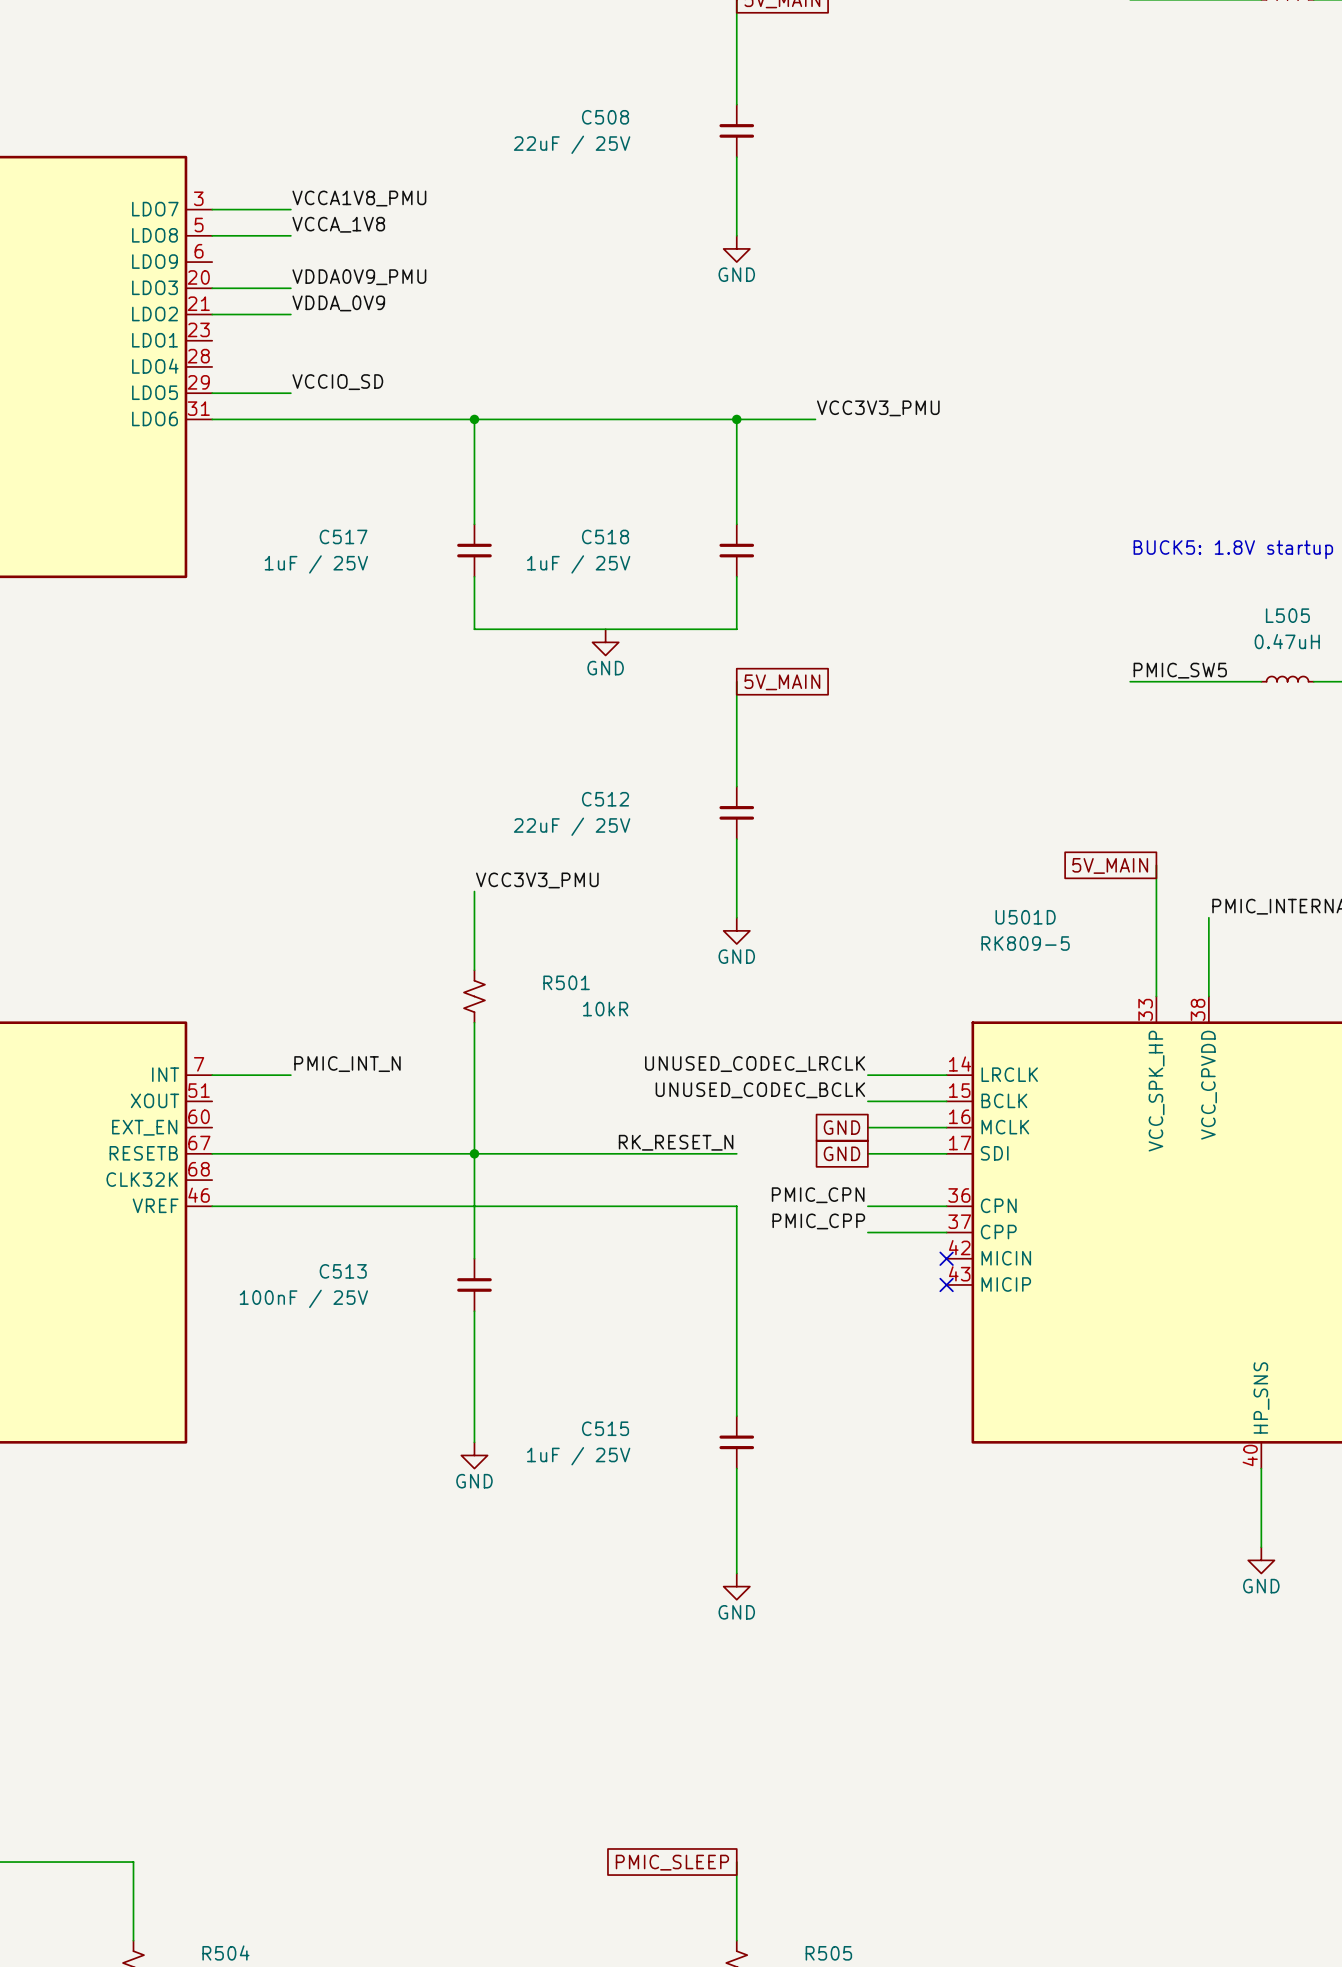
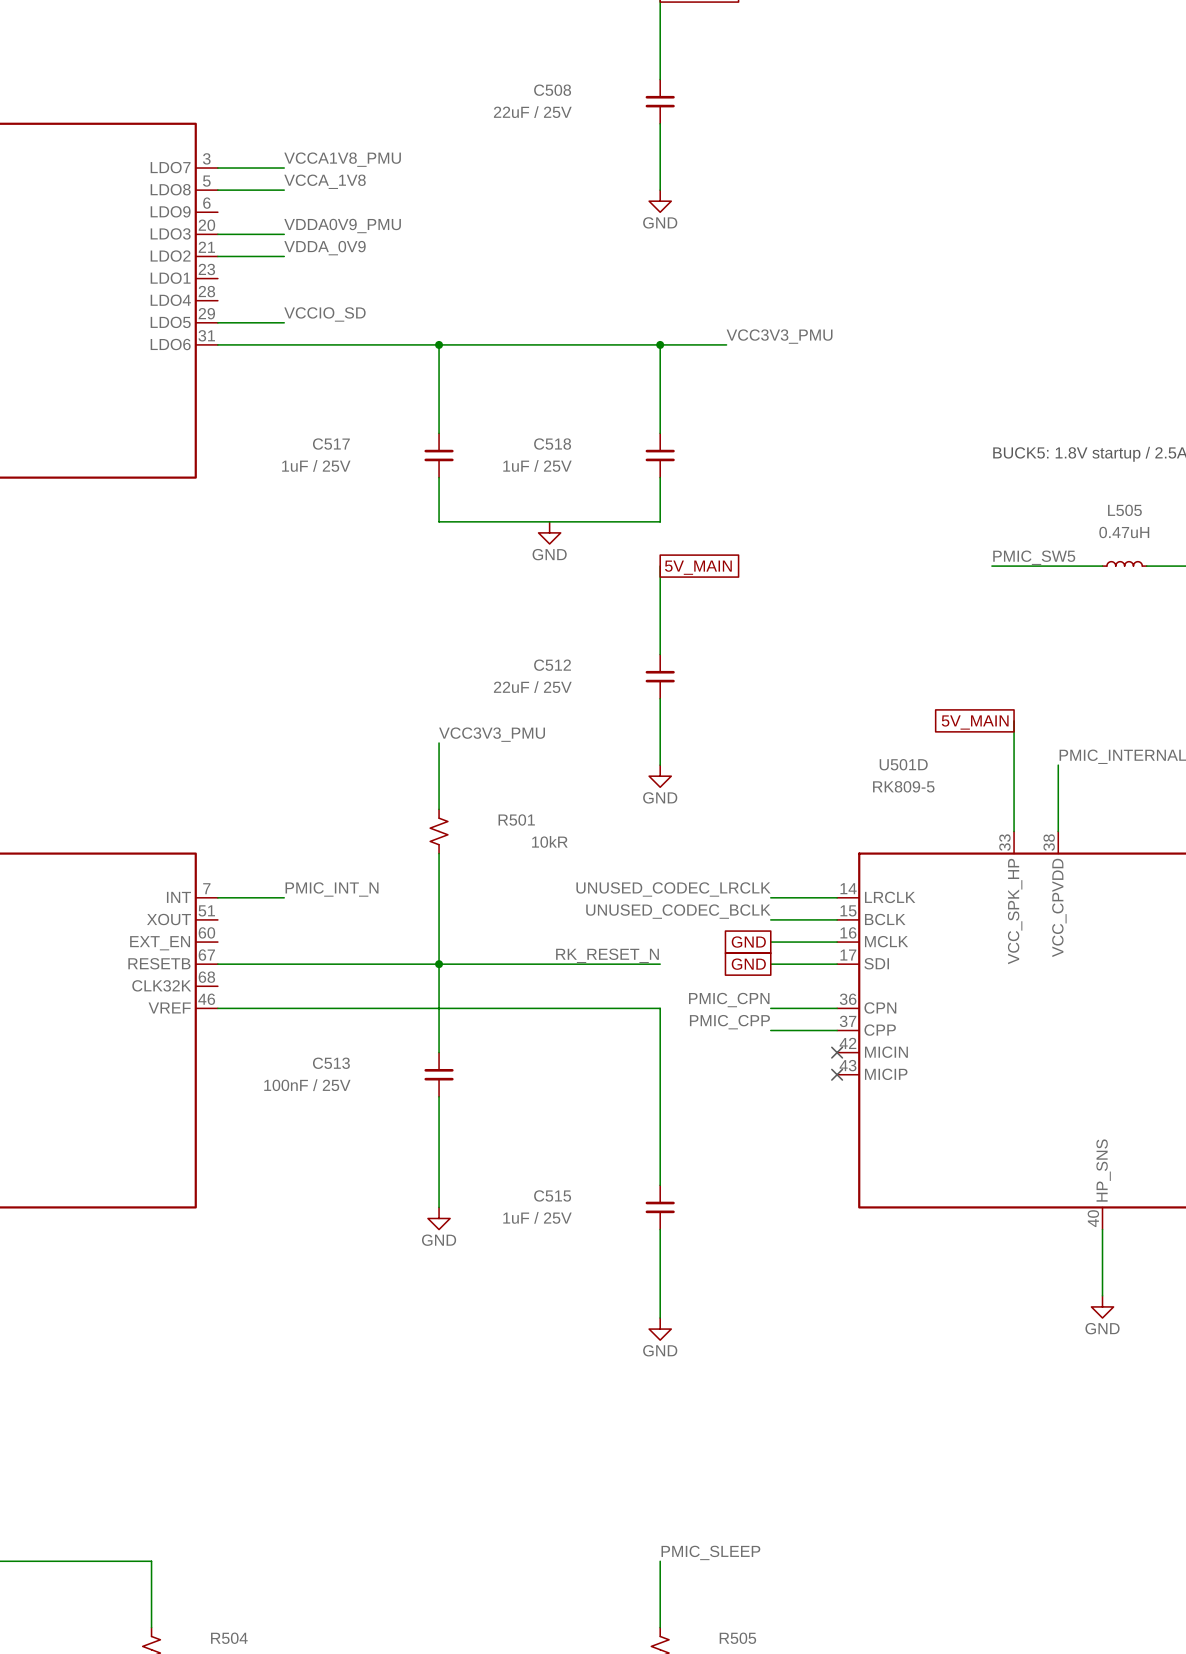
label: none -> PMIC_SLEEP (710, 1552)
global label: PMIC_SLEEP (672, 1862) -> none

